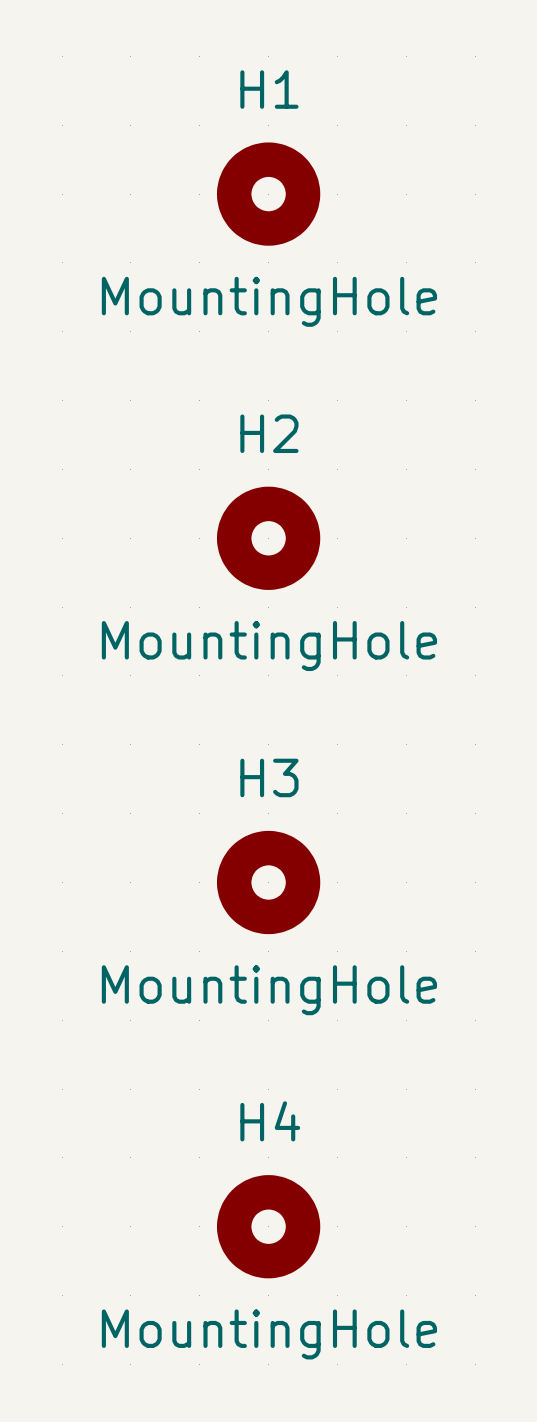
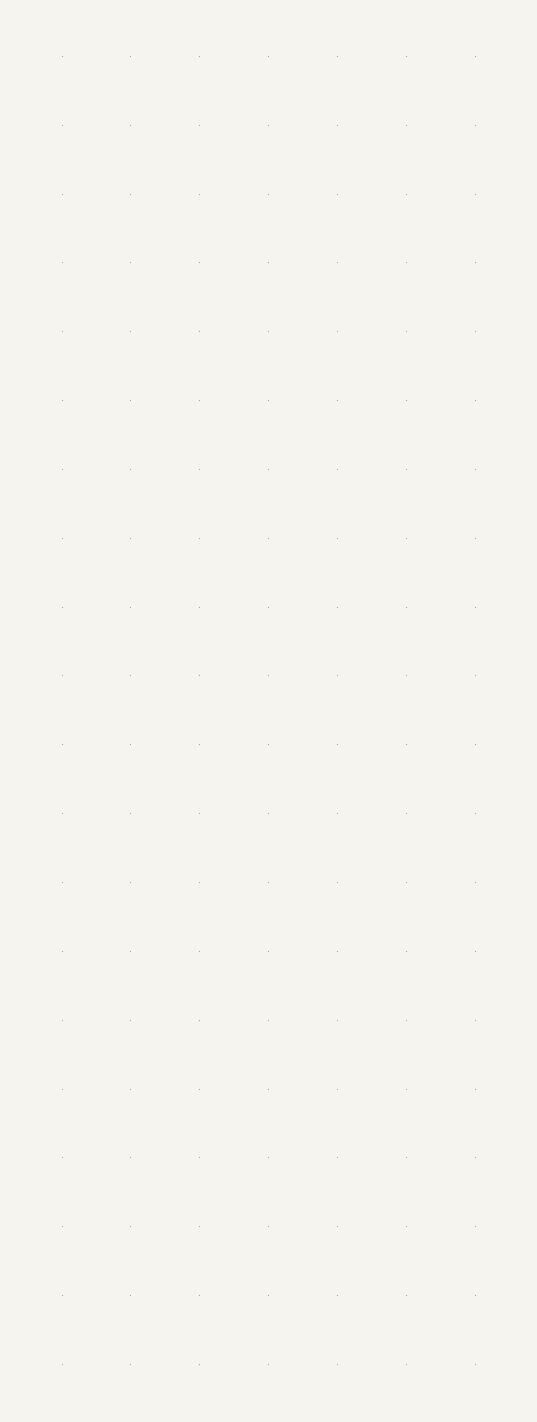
H1: MountingHole (268, 194) -> none
H2: MountingHole (268, 538) -> none
H3: MountingHole (268, 882) -> none
H4: MountingHole (268, 1226) -> none

